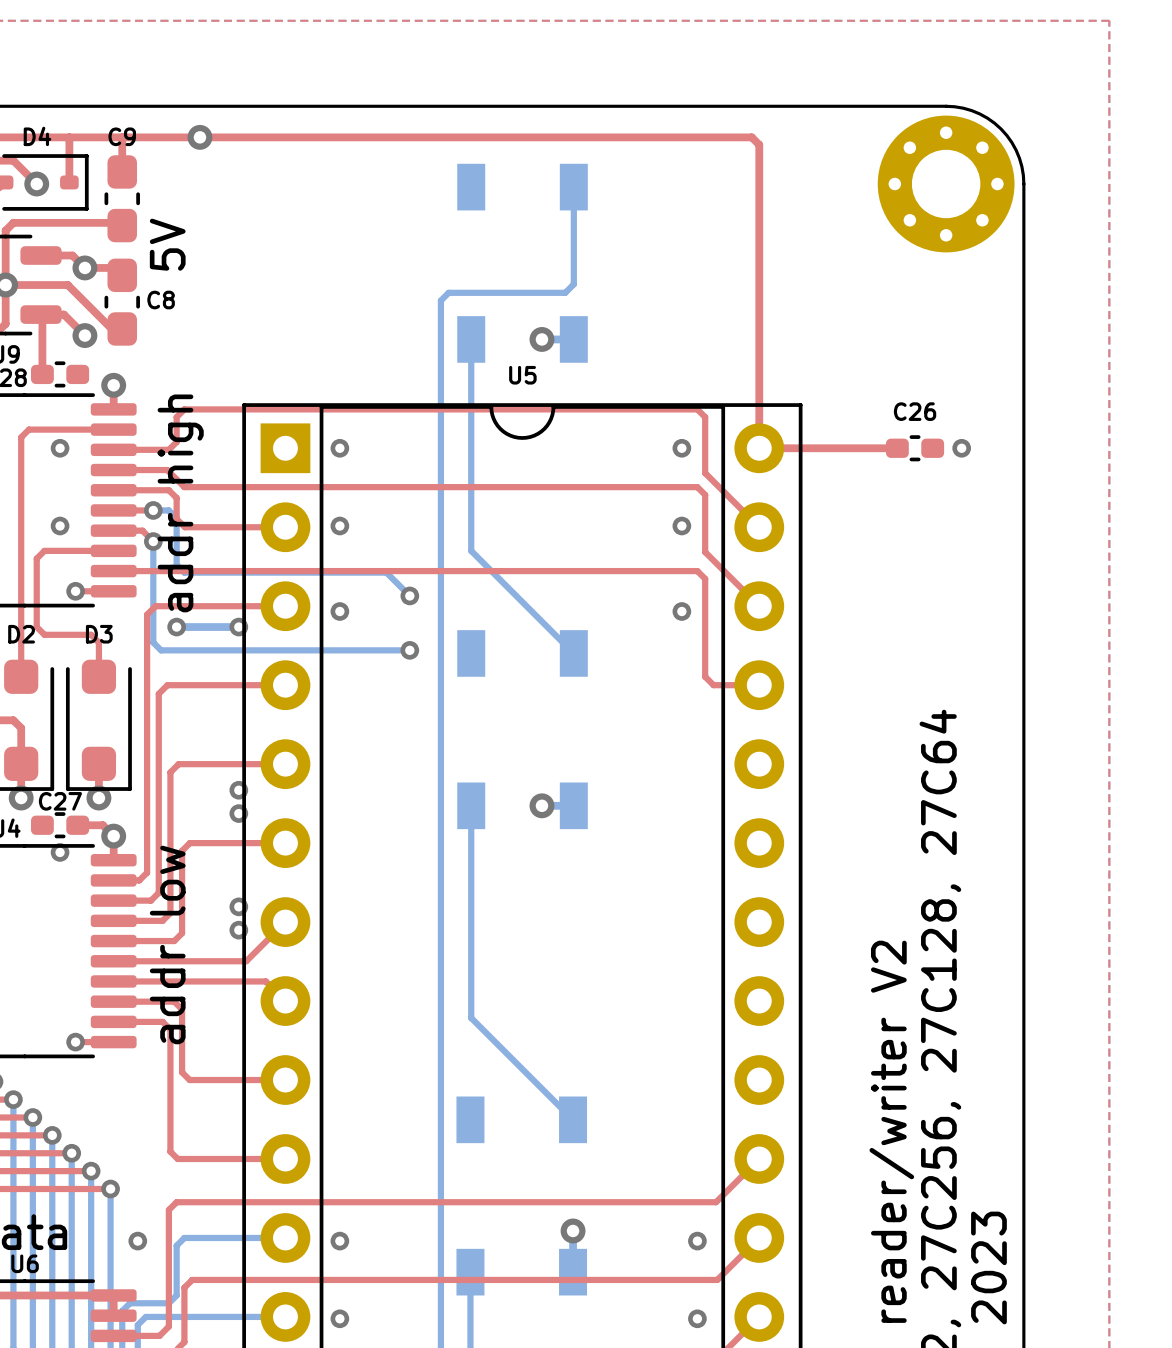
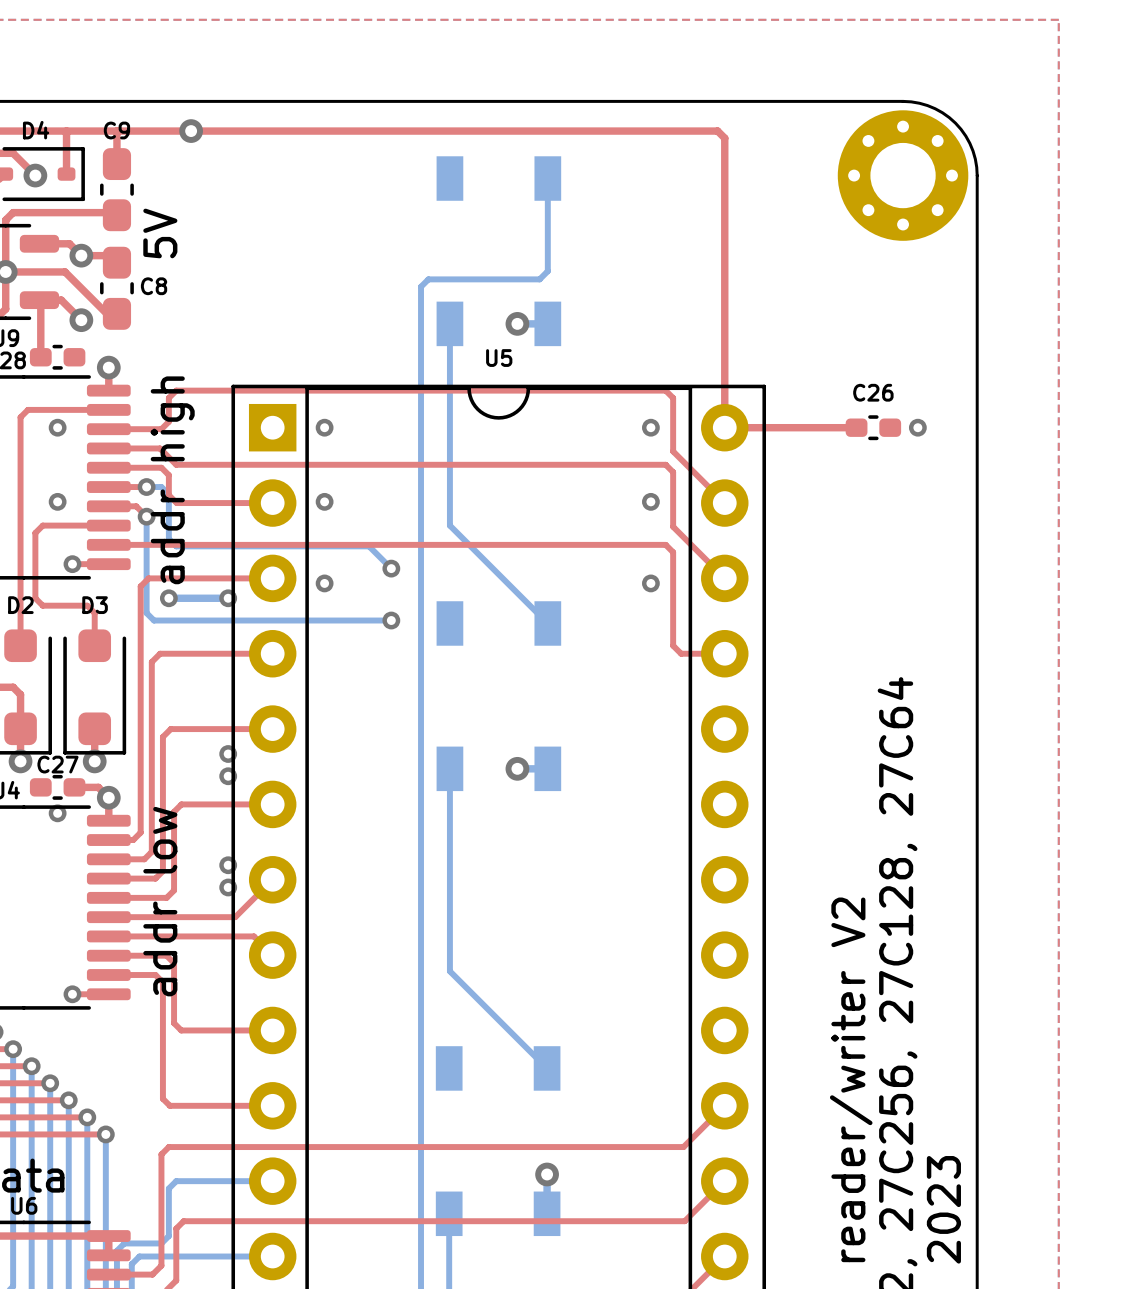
via: (137, 1241) -> none
via: (339, 1241) -> none
via: (697, 1241) -> none
via: (339, 1318) -> none
via: (697, 1318) -> none

